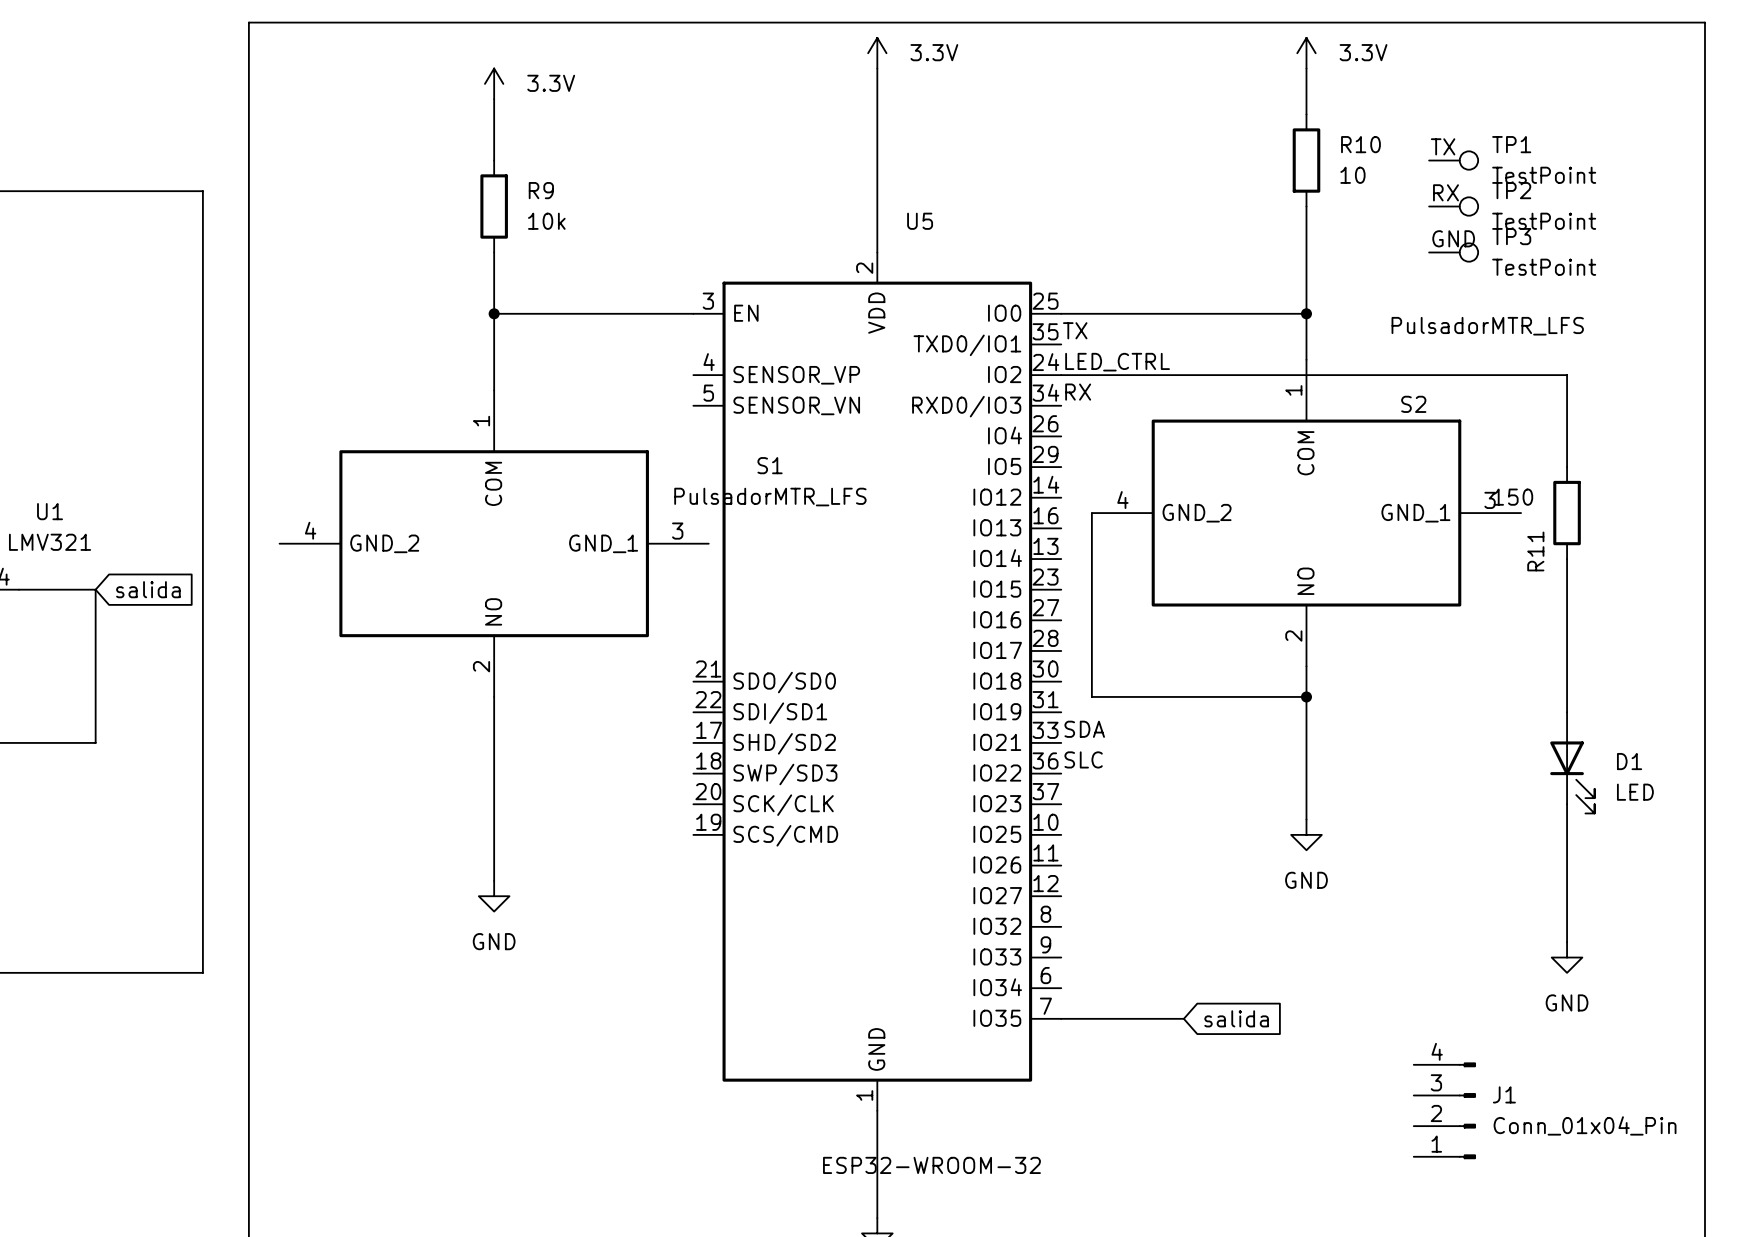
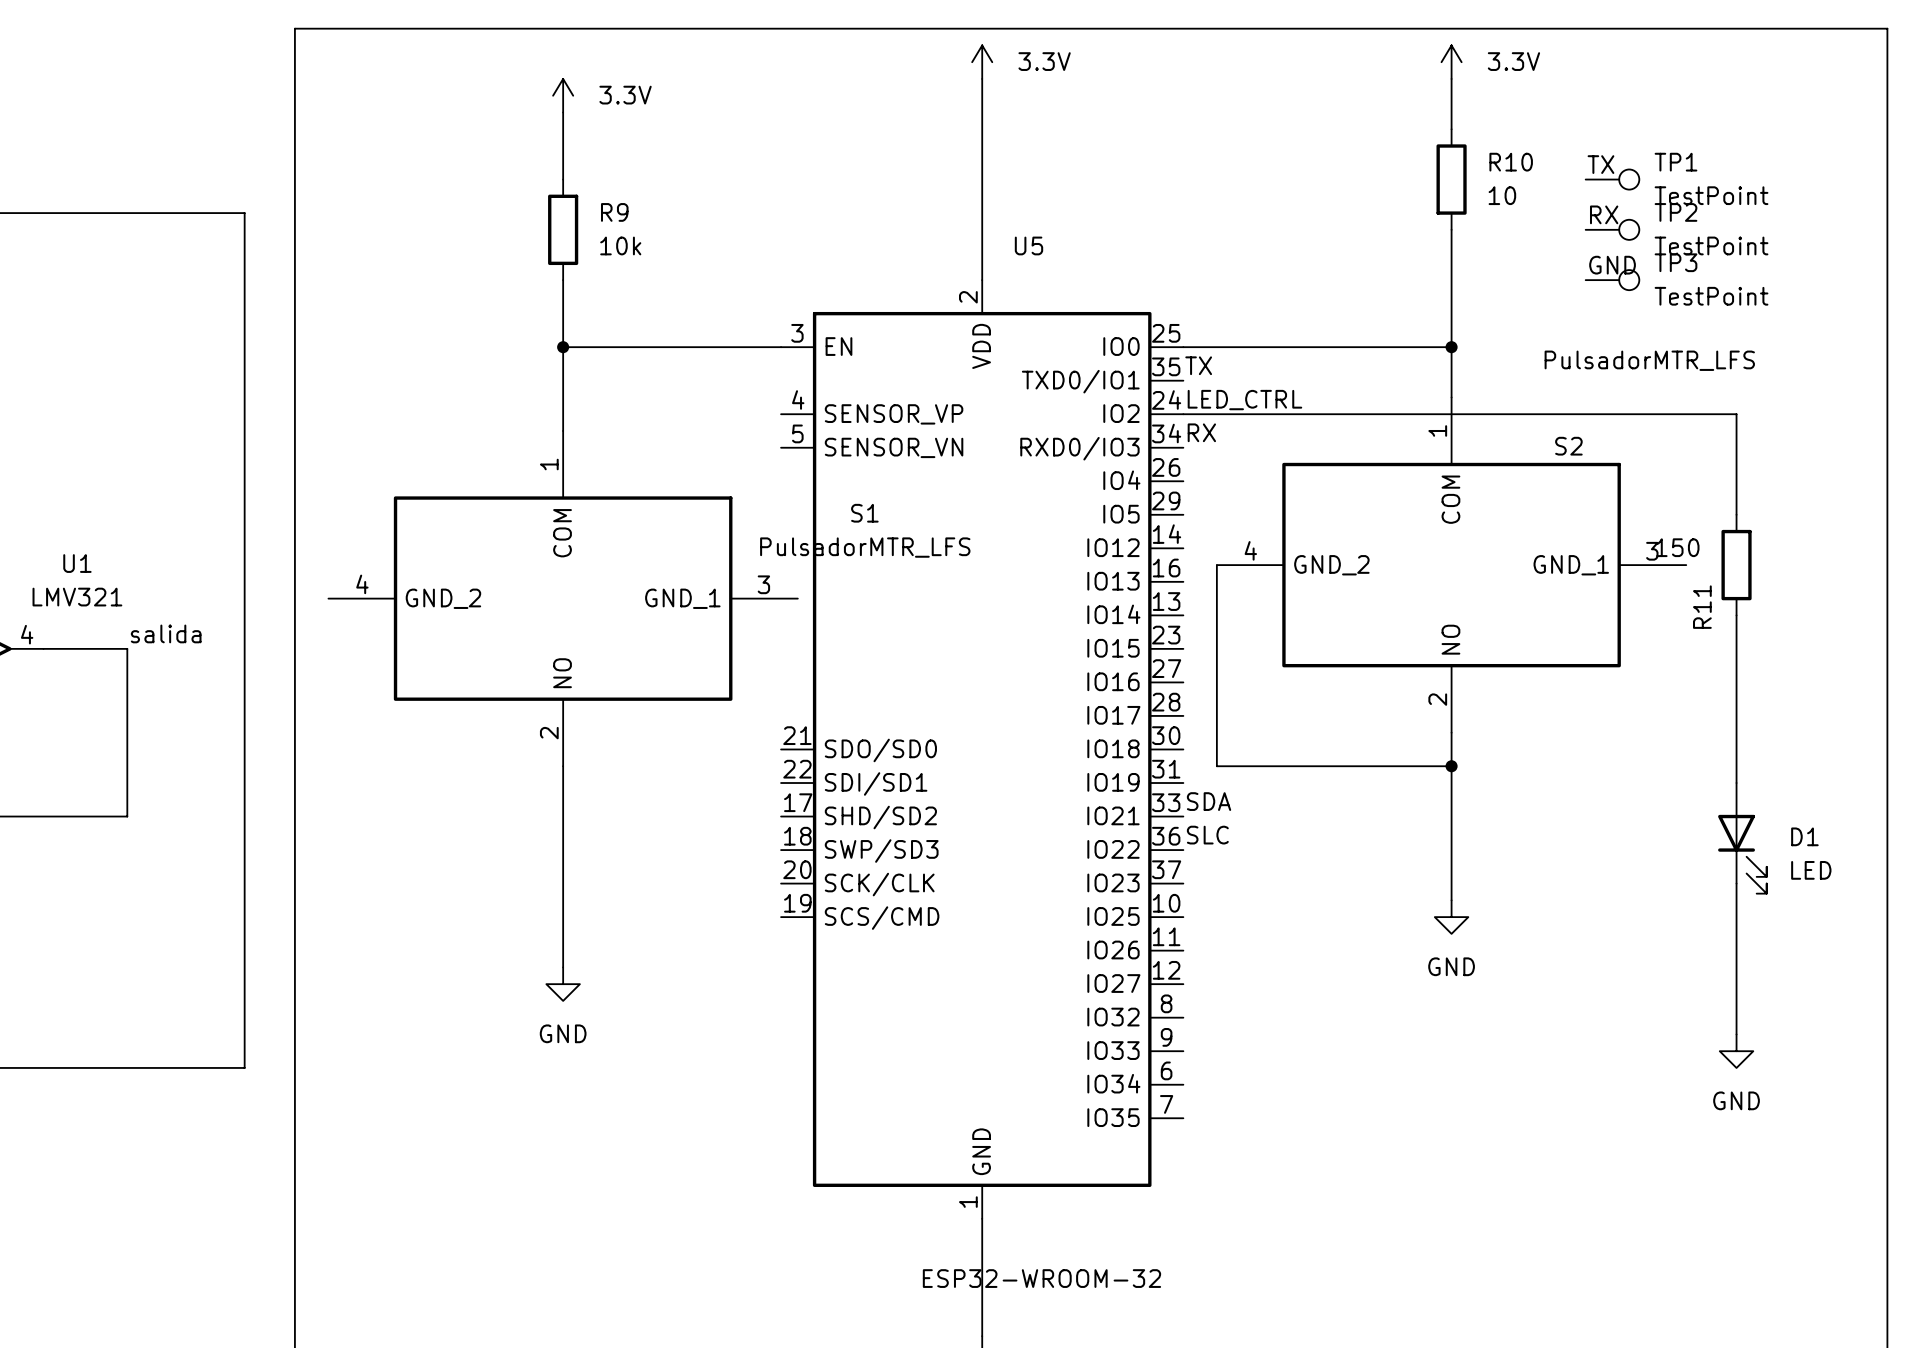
label: none -> salida (166, 633)
global label: salida (148, 589) -> none
wire: (1061, 1018) (1183, 1018) -> none
global label: salida (1236, 1018) -> none
J1: Conn_01x04_Pin (1444, 1110) -> none

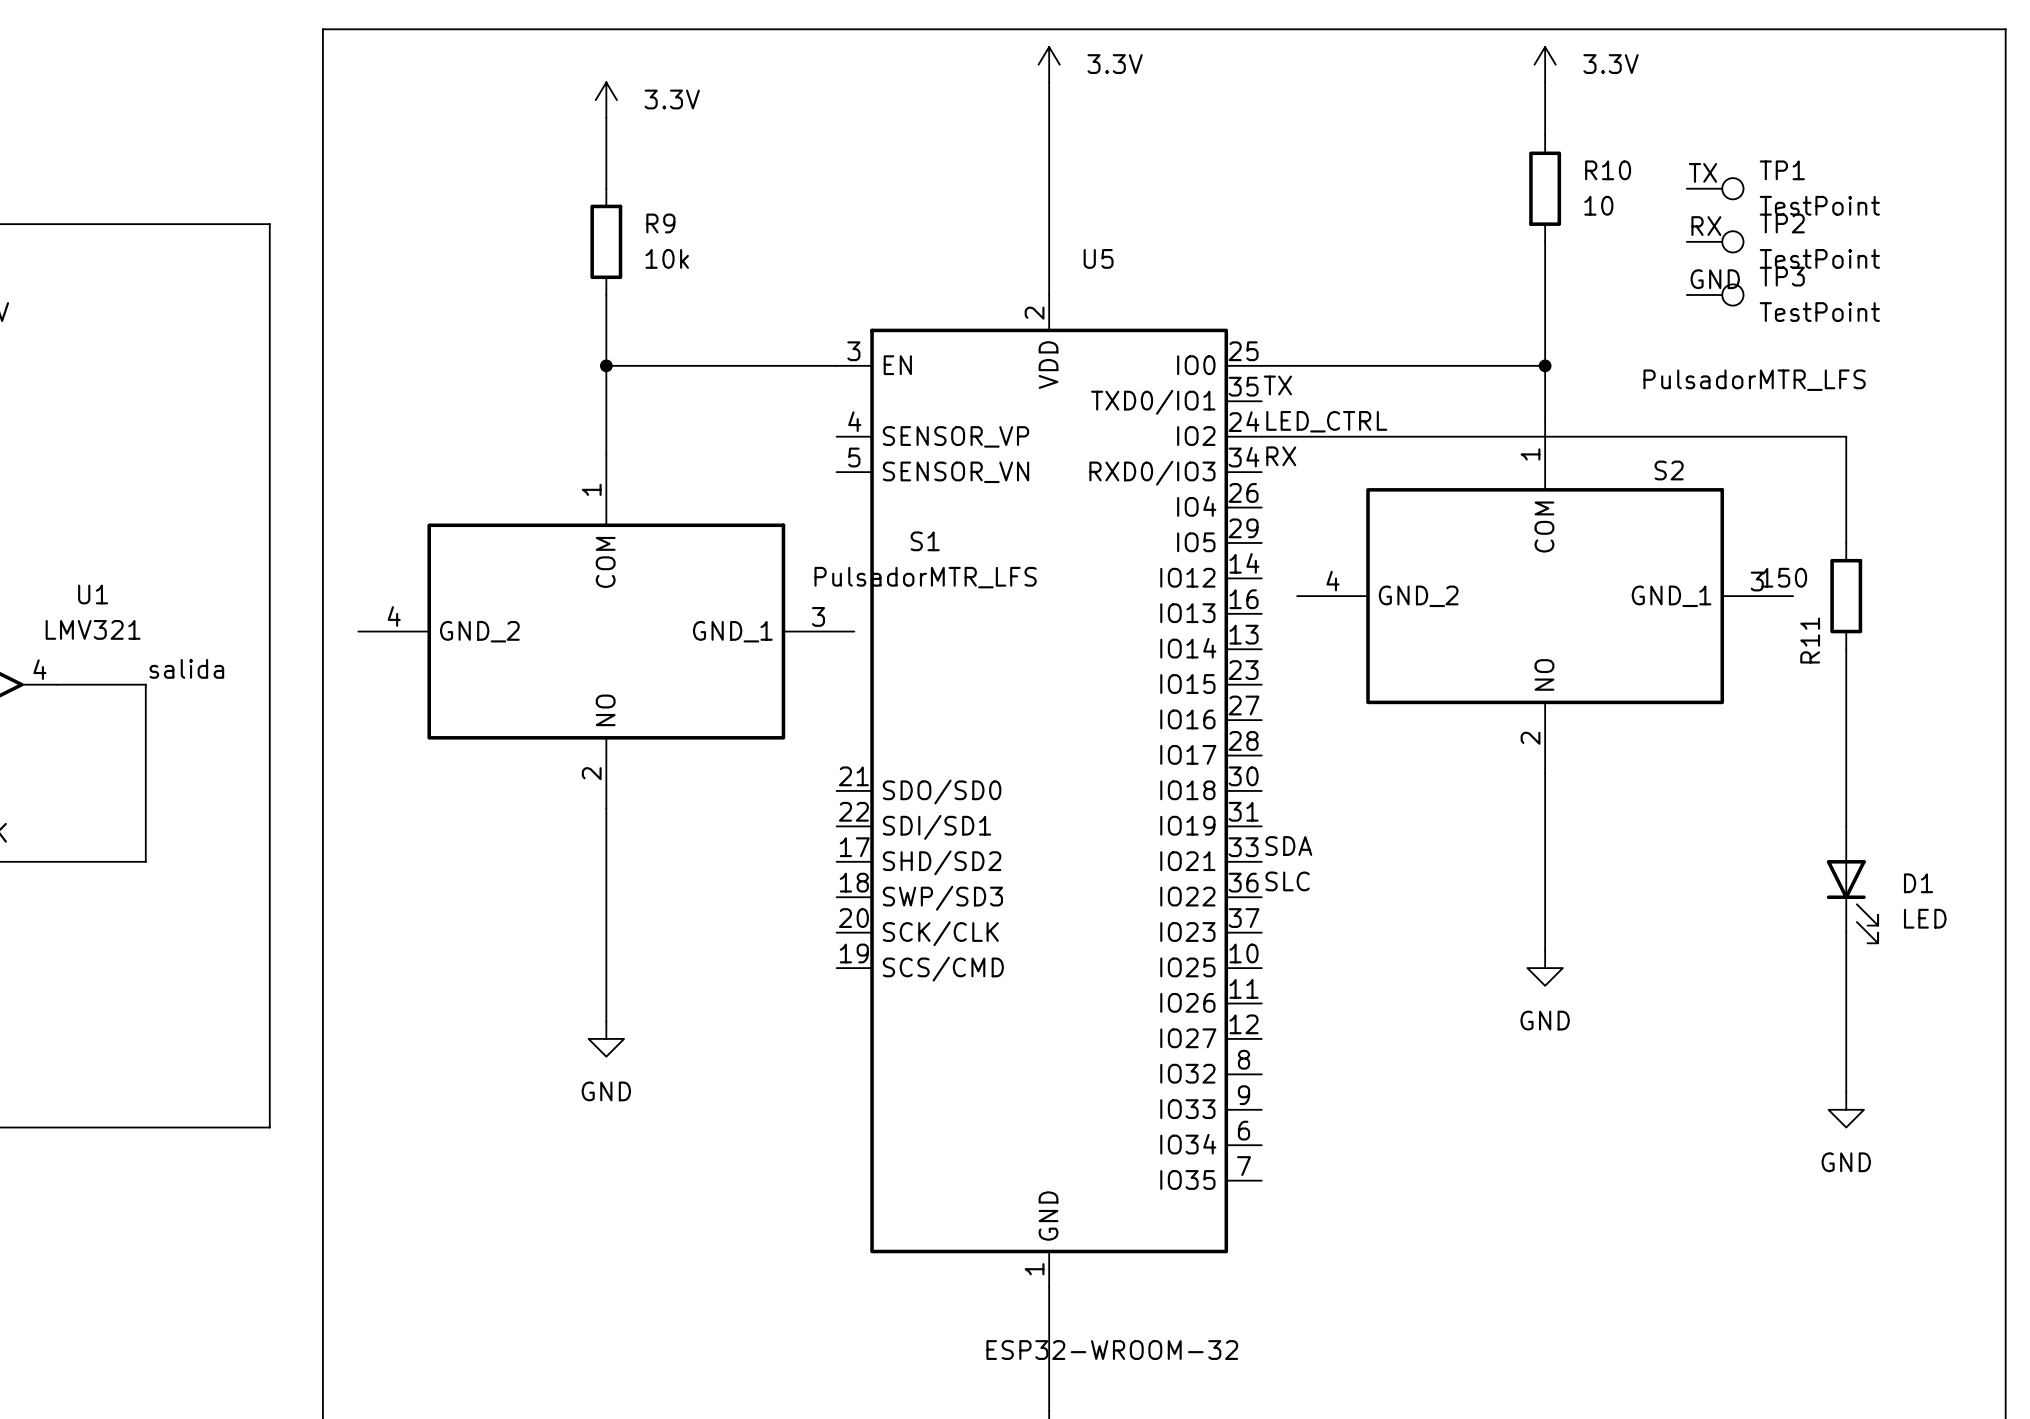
wire: (1216, 565) (1216, 766) (1451, 766) -> none
junction: (1451, 766) -> none

